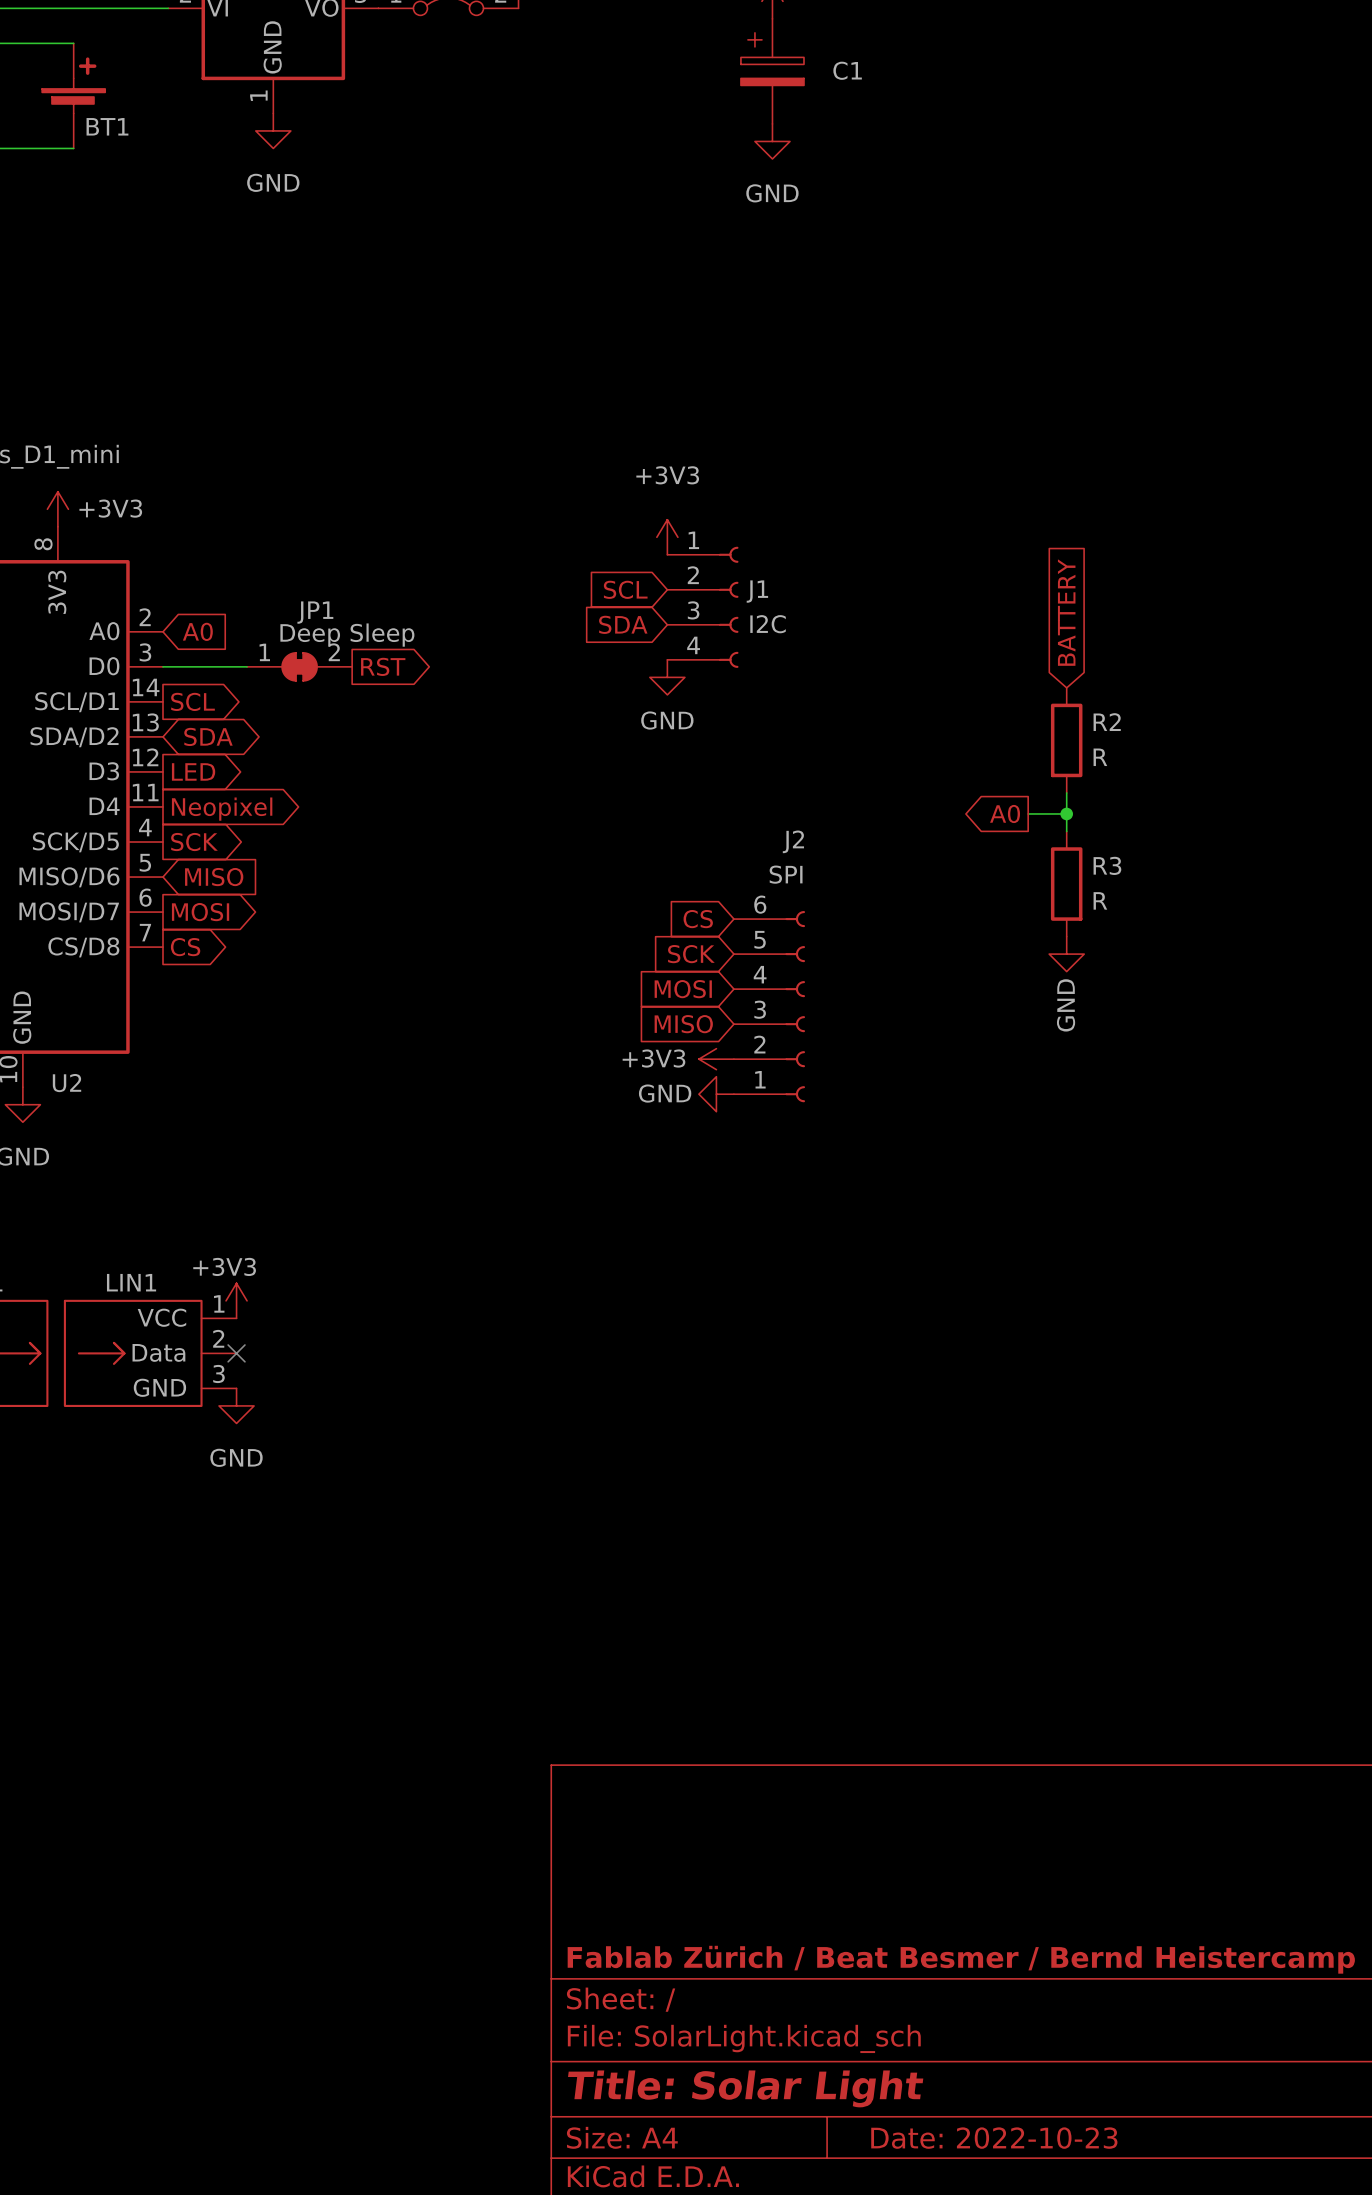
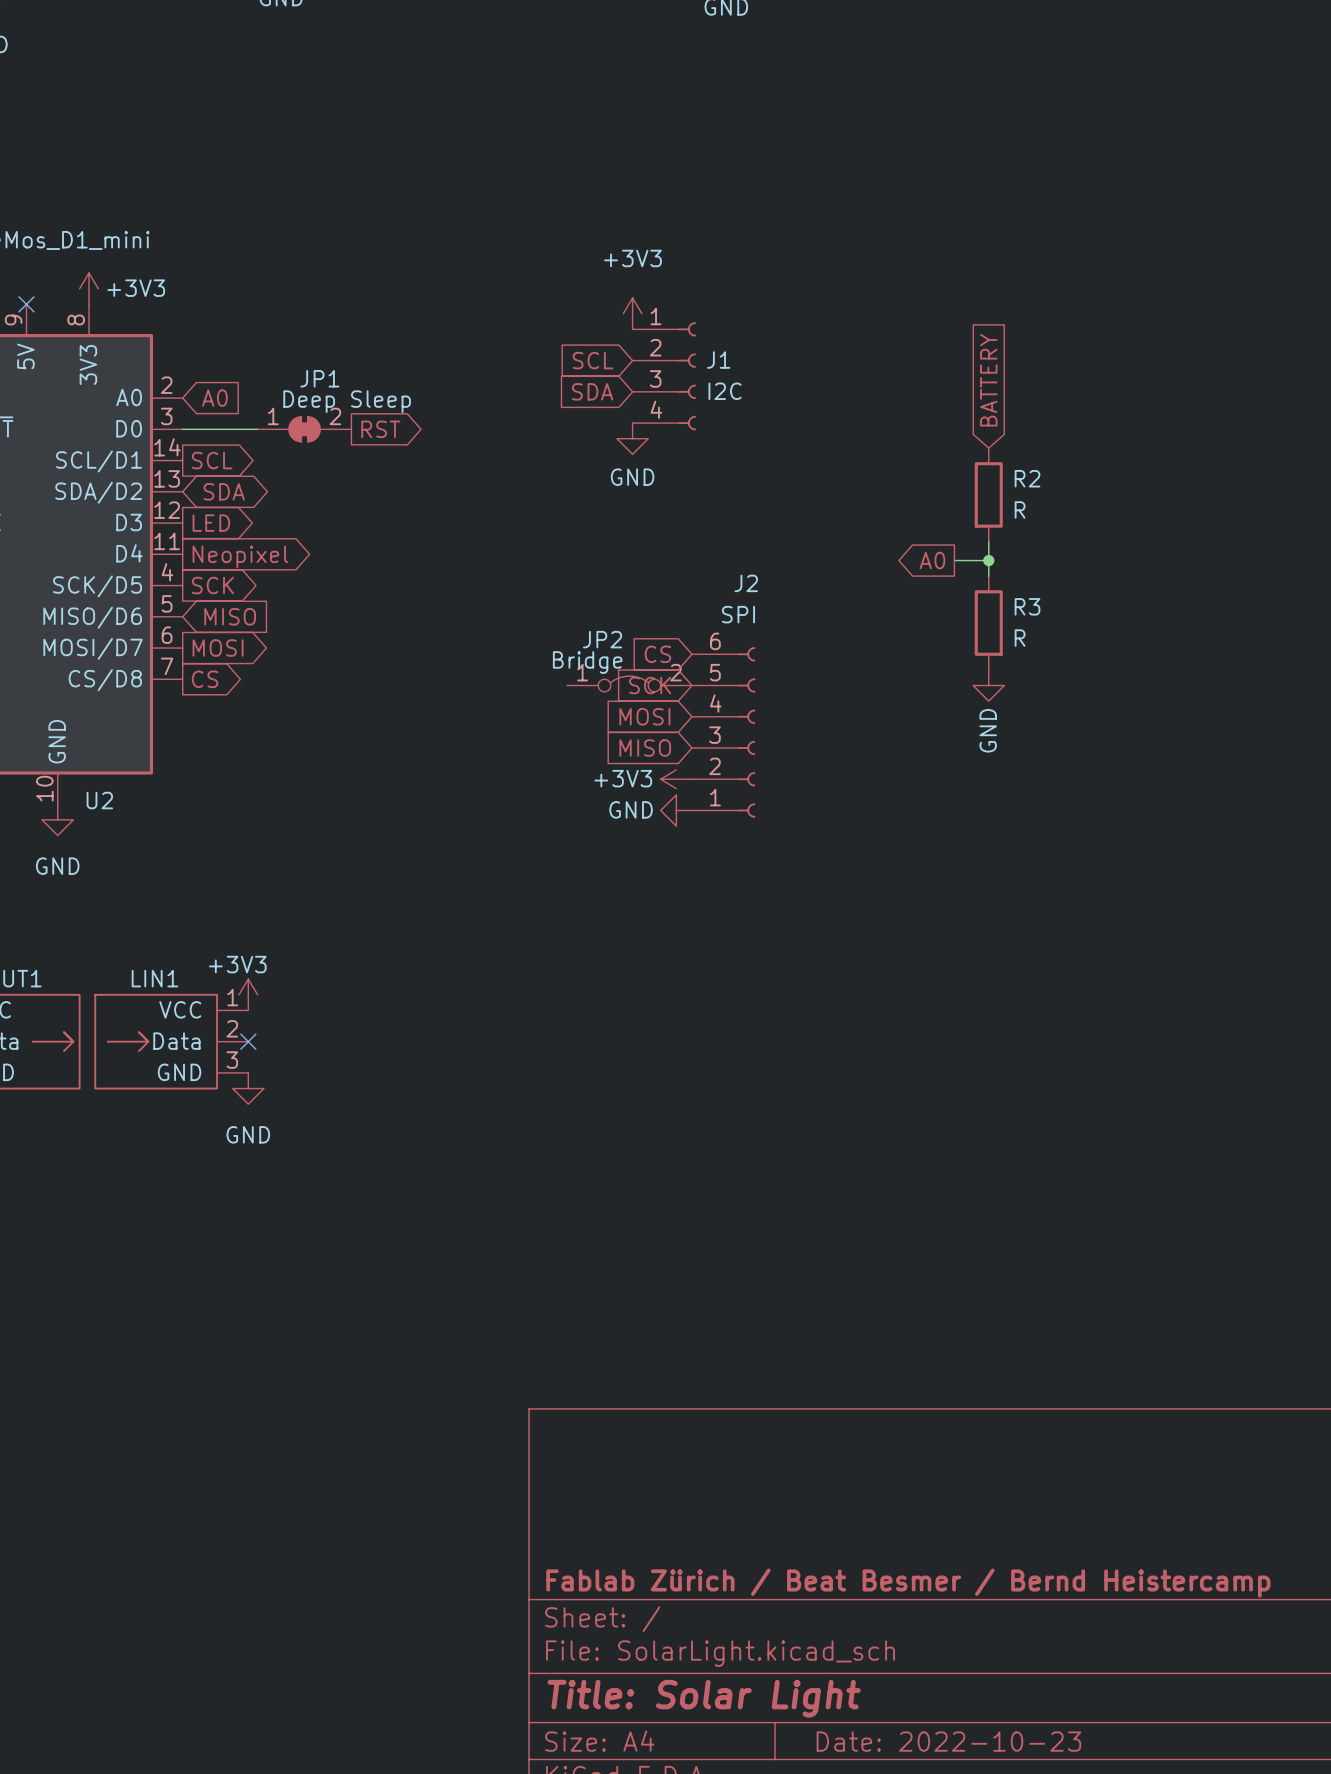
JP2: none -> Bridge (629, 683)

